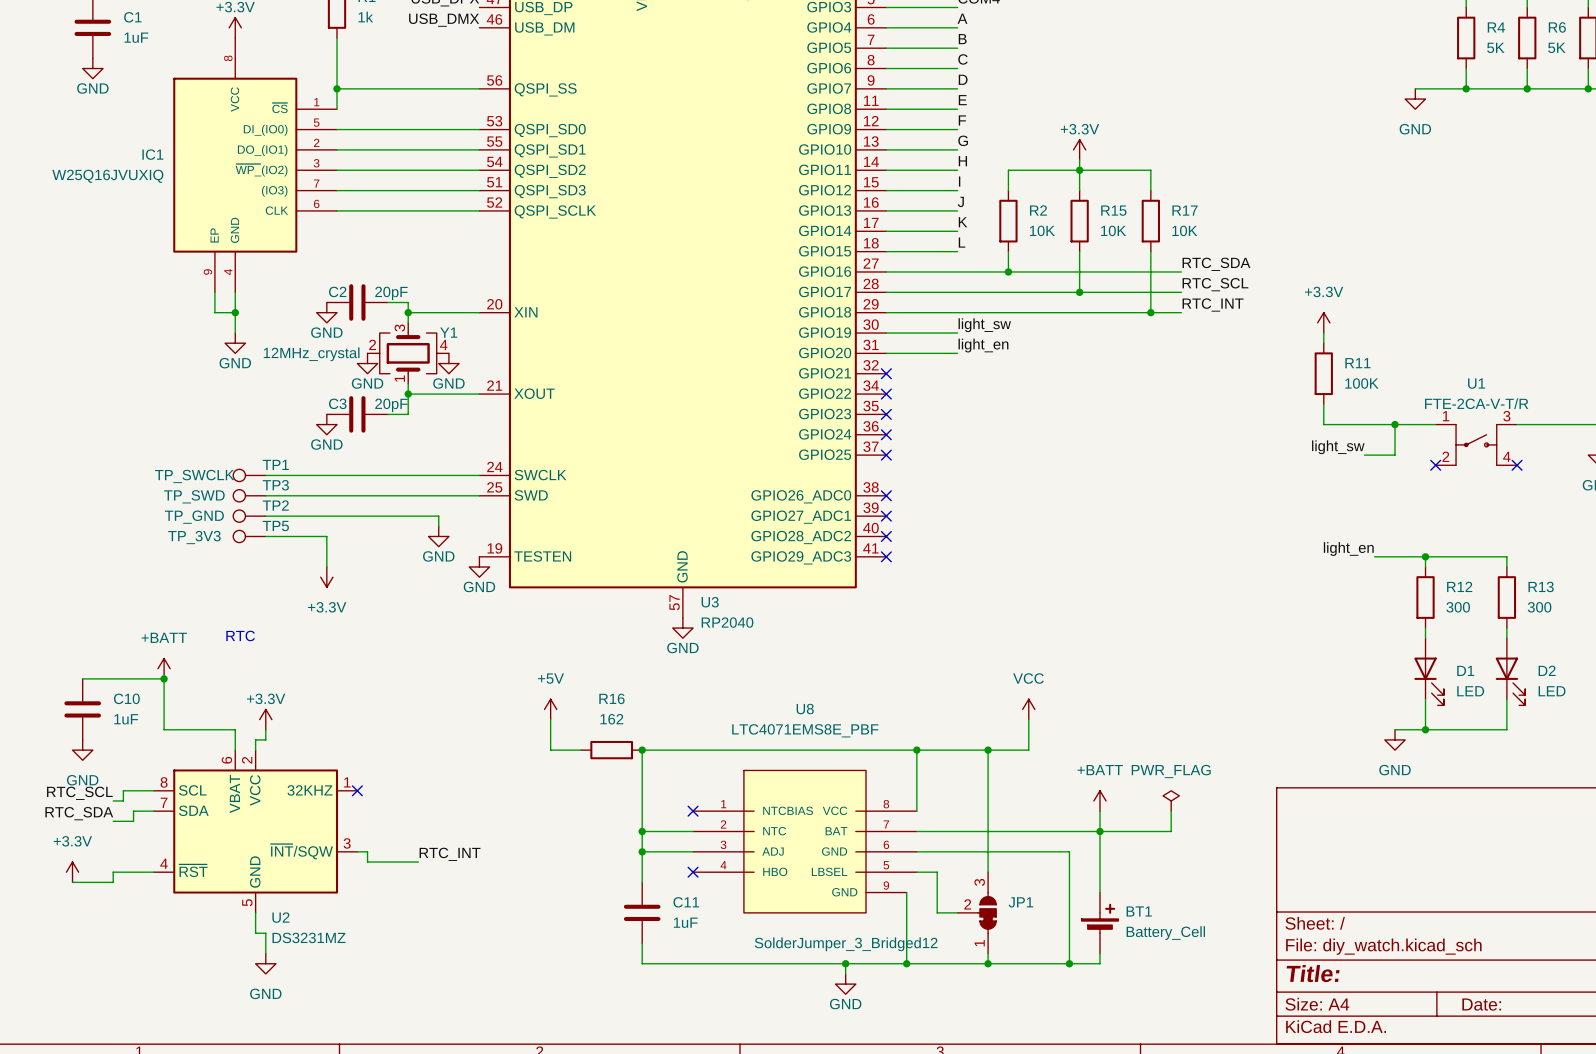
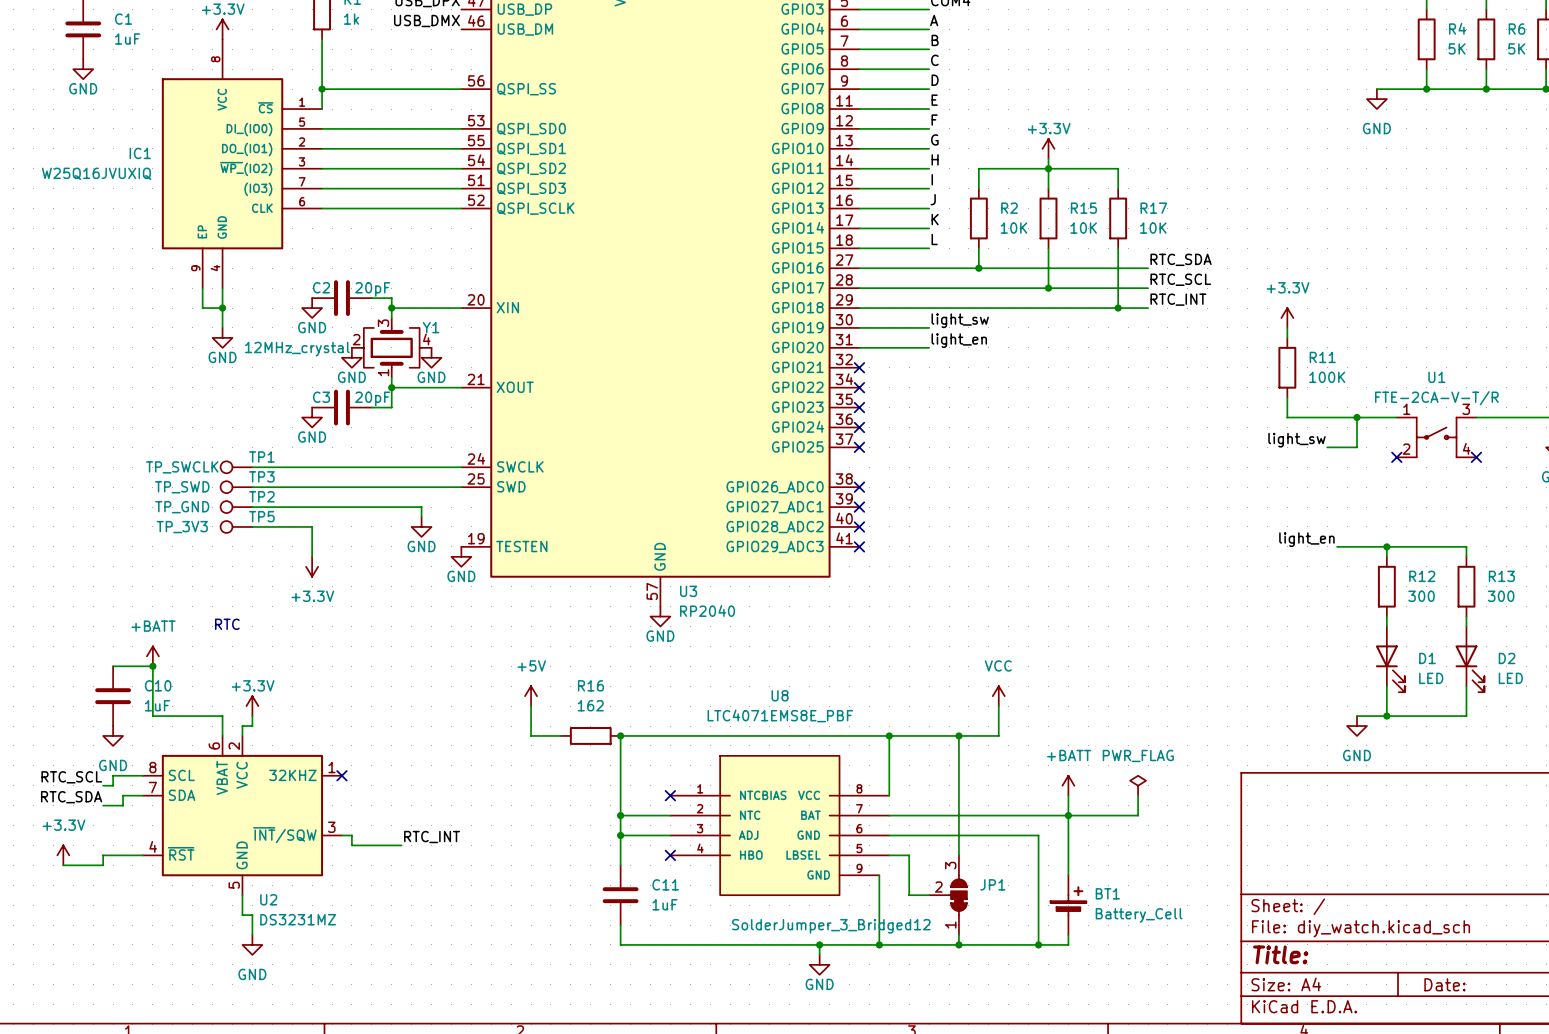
wire: (82, 678) (123, 678) -> none
C10 position: (82, 709) -> (113, 696)
power symbol position: GND (82, 750) -> GND (113, 735)

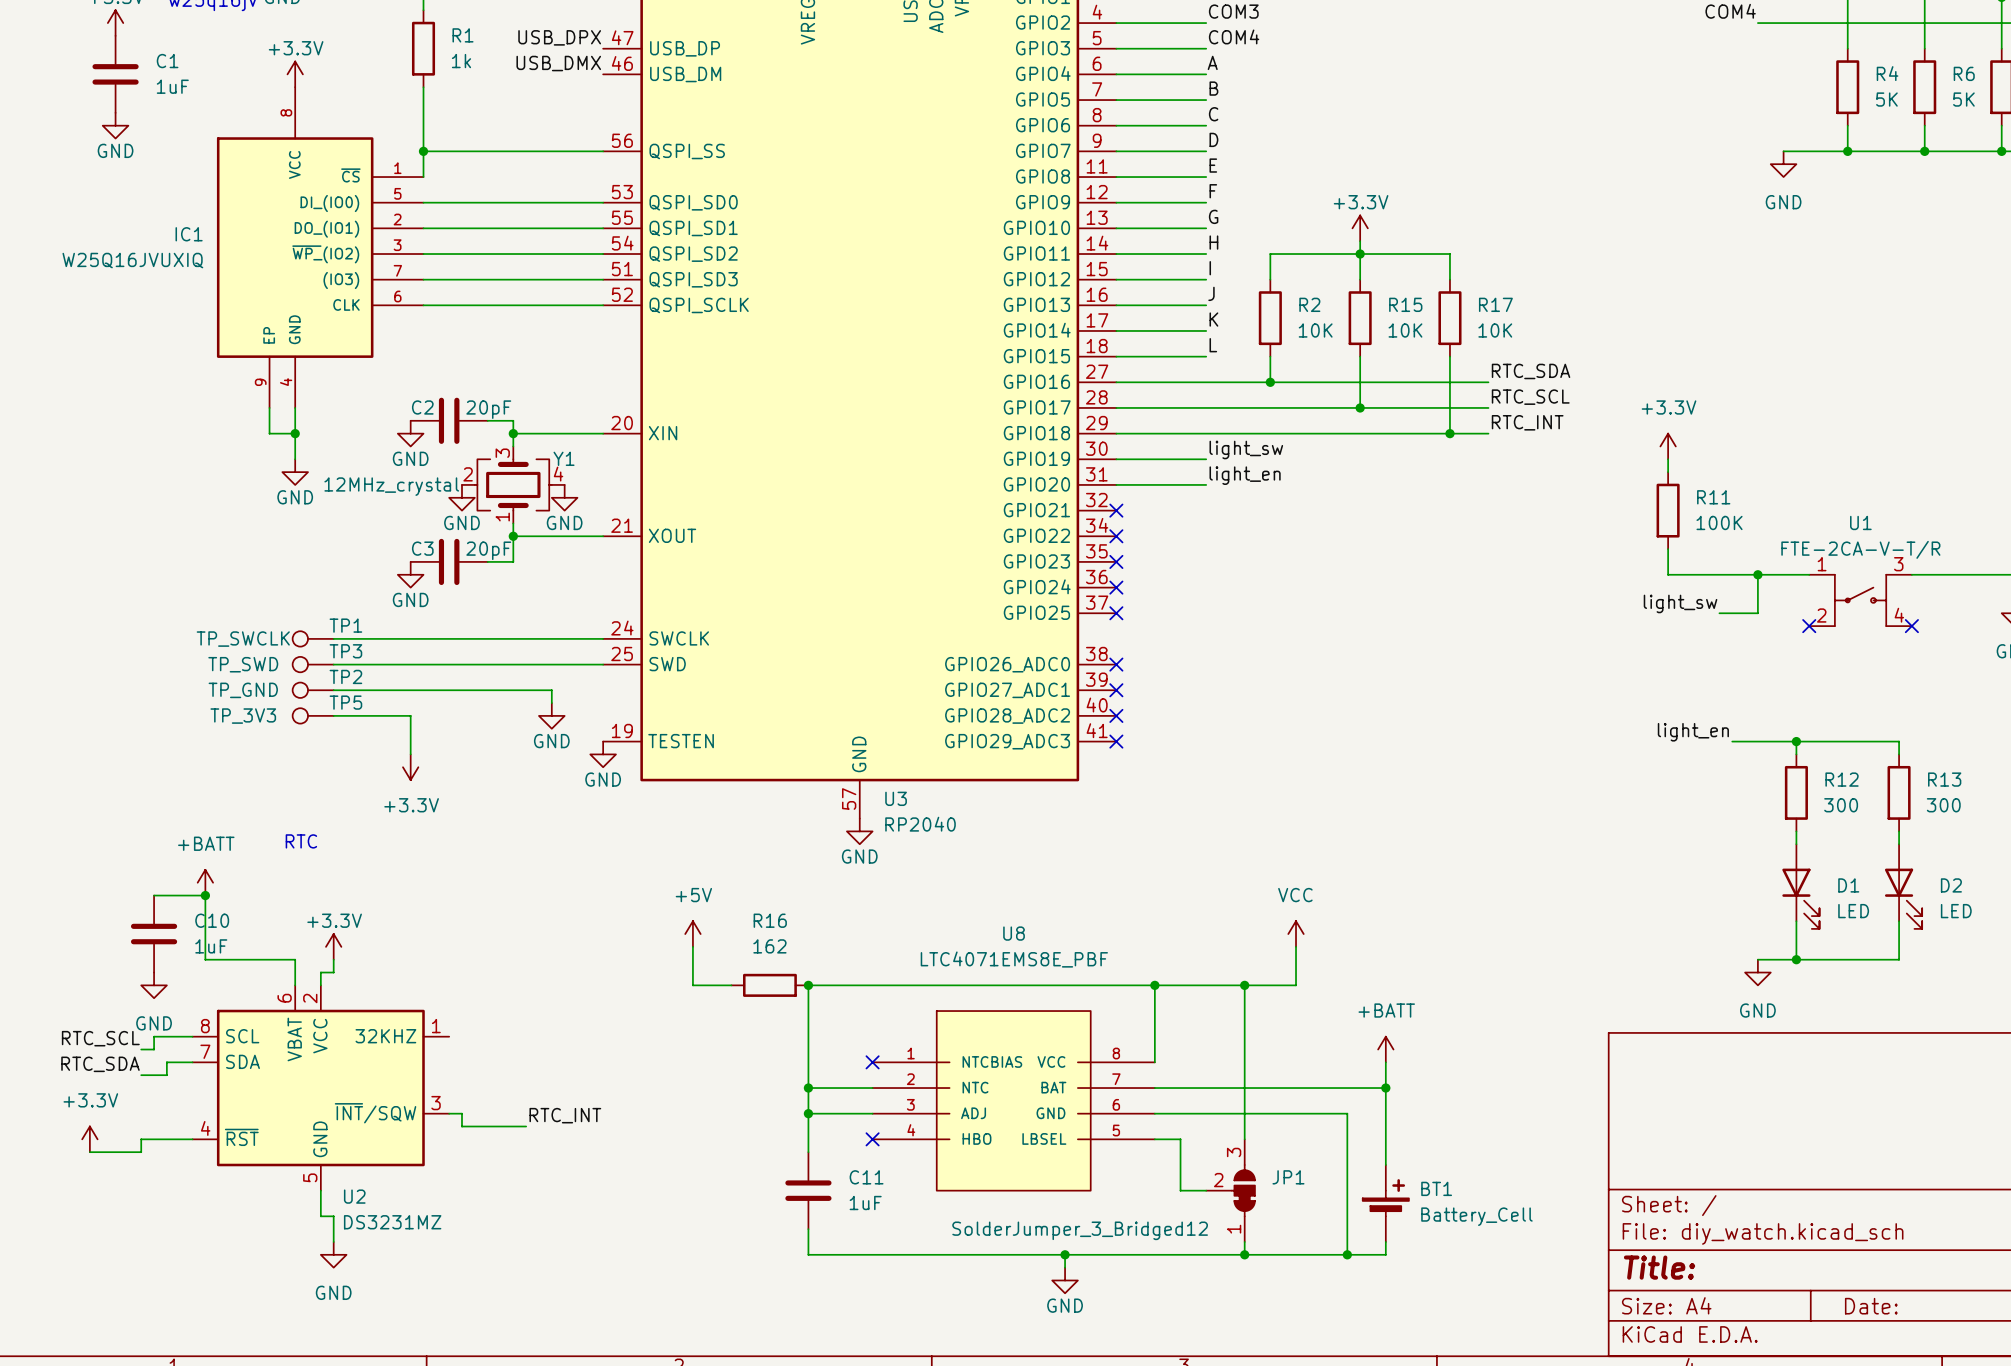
U8 symbol: [670, 755, 890, 896] -> [872, 1010, 1155, 1192]
no-connect mark: (341, 775) -> none
power symbol: PWR_FLAG (1138, 785) -> none
wire: (1138, 795) (1138, 815) (1068, 815) -> none
wire: (879, 875) (879, 944) -> none
junction: (879, 944) -> none

